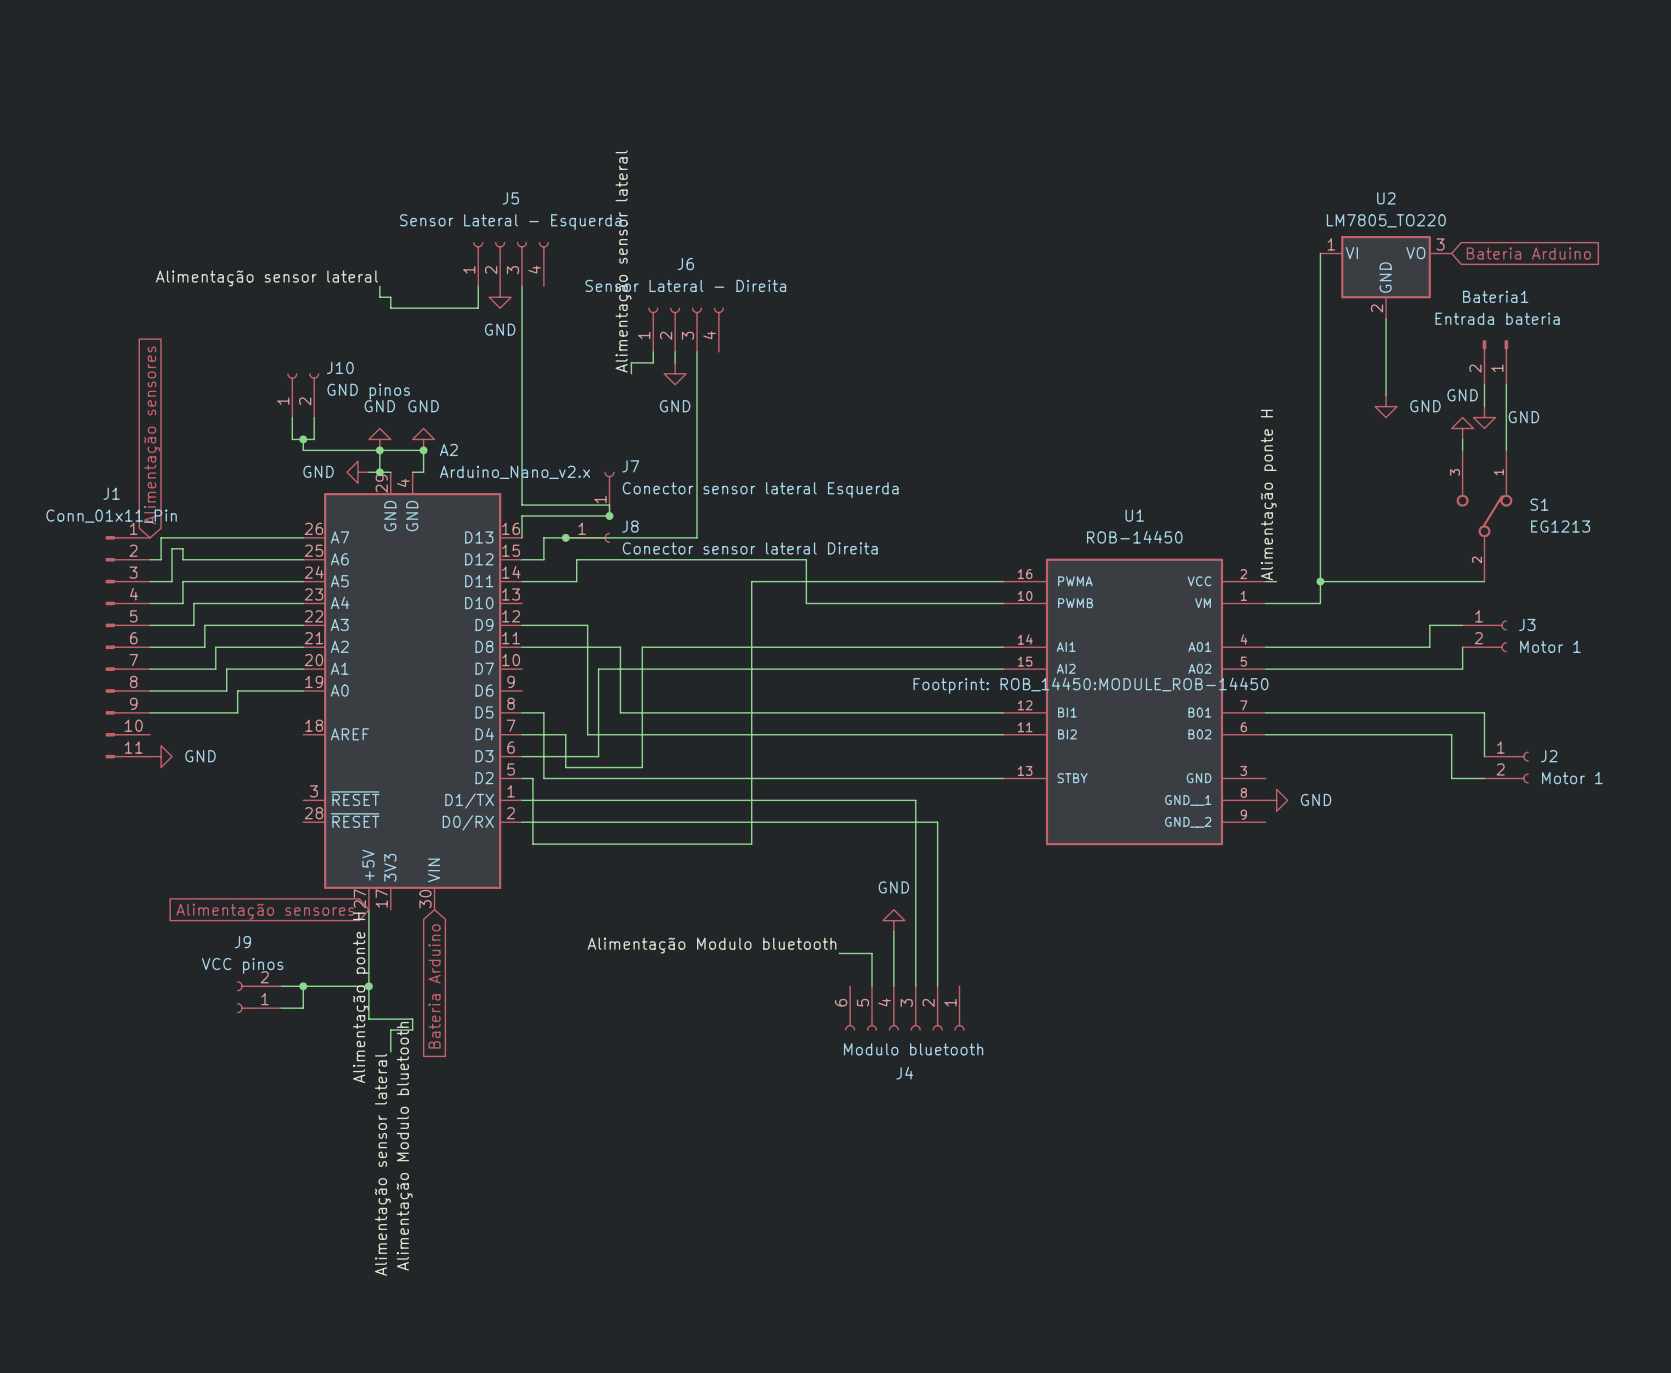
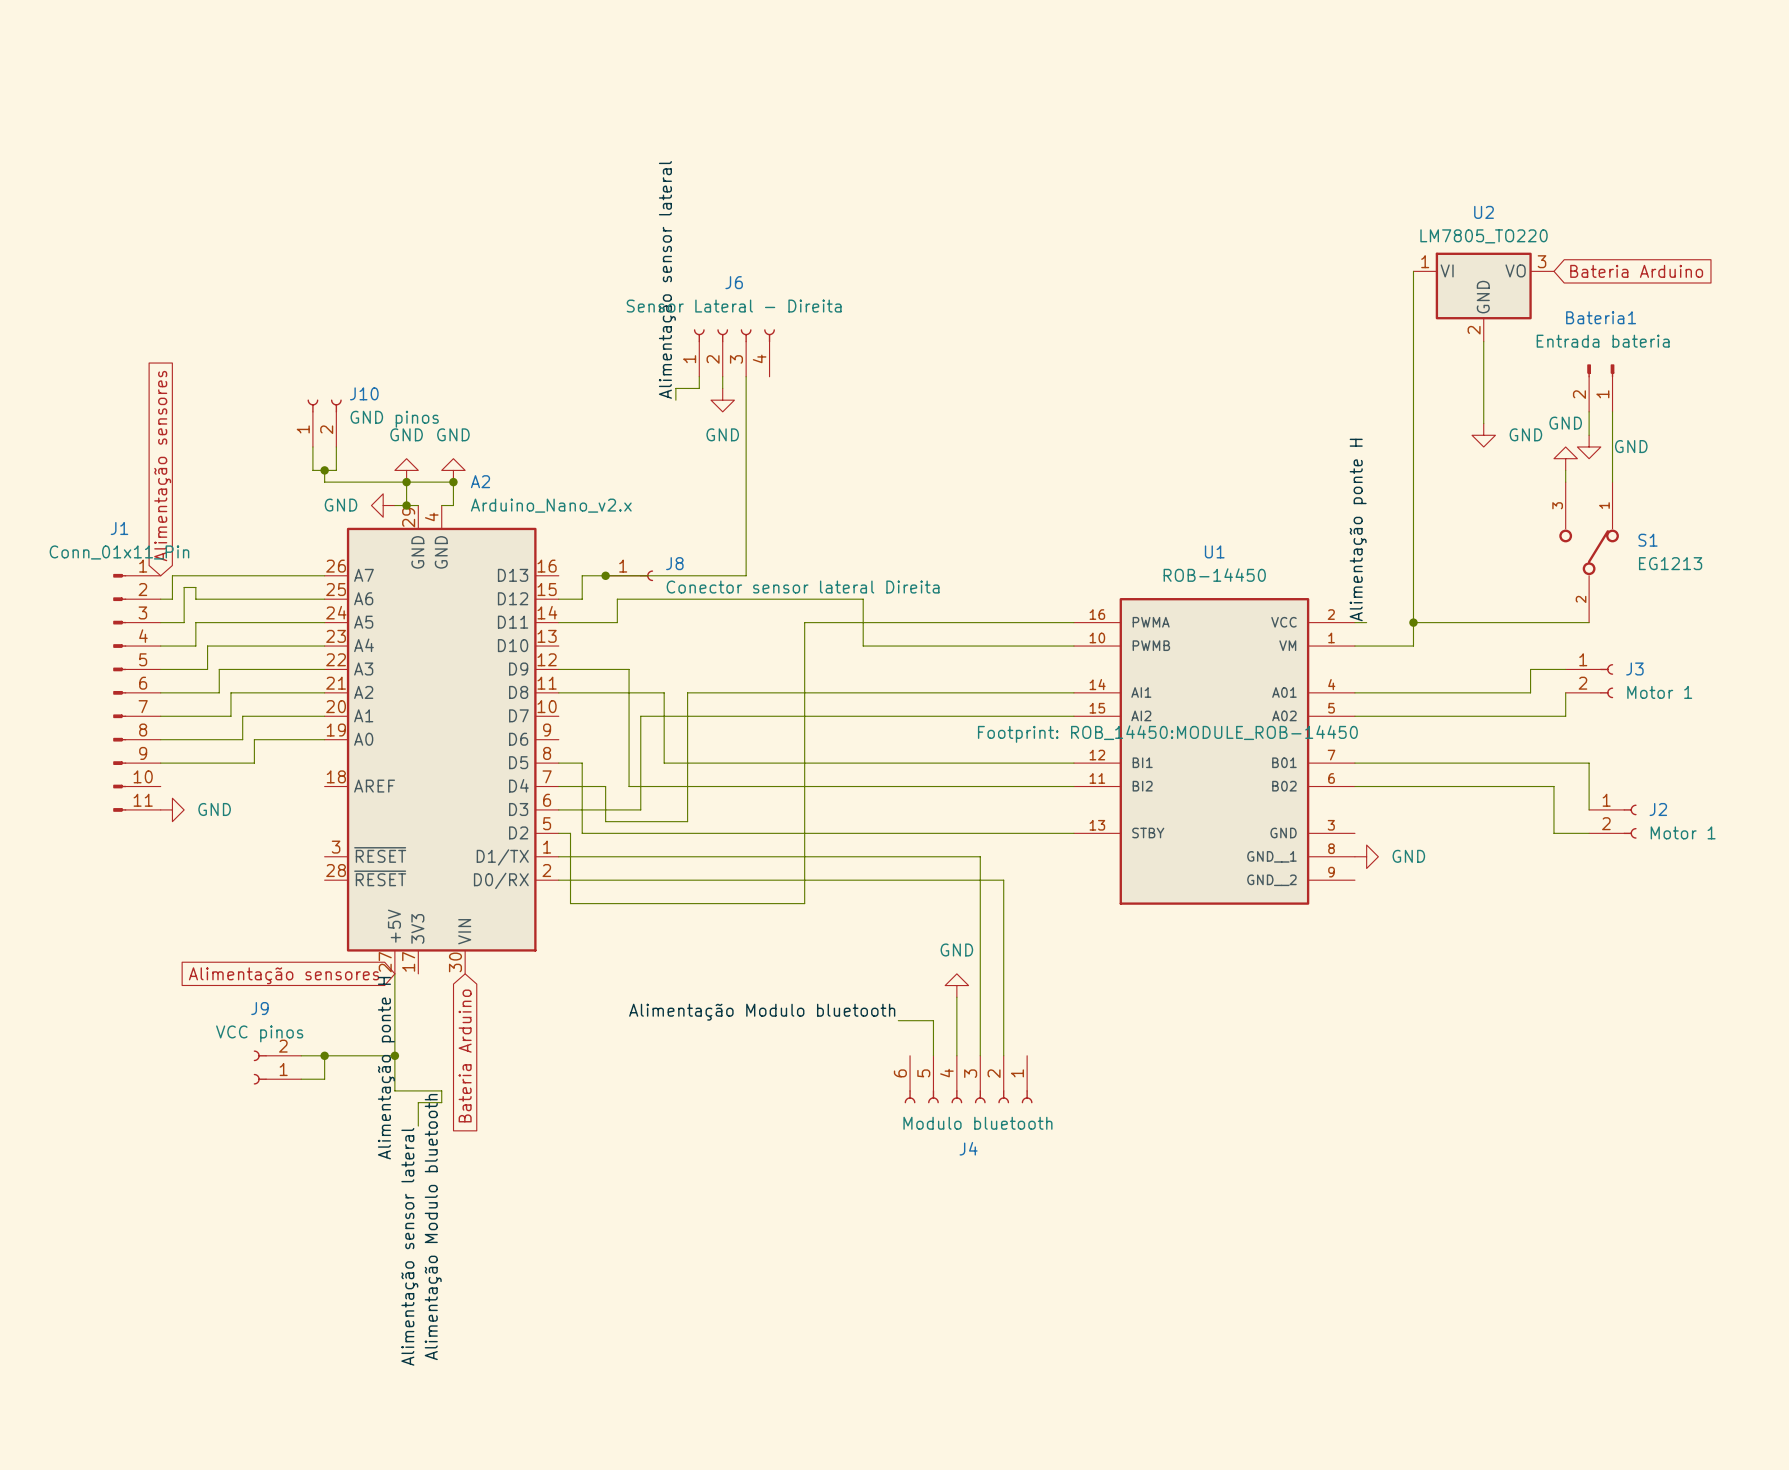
J5: Sensor Lateral - Esquerda (511, 264) -> none
label: Alimentação sensor lateral (266, 278) -> none
wire: (379, 286) (379, 297) (390, 297) (390, 308) (478, 308) (478, 286) -> none
wire: (522, 286) (522, 505) (609, 505) (609, 515) (522, 515) (522, 537) -> none
power symbol: GND (500, 297) -> none
J7: Conector sensor lateral Esquerda (609, 493) -> none
junction: (609, 515) -> none

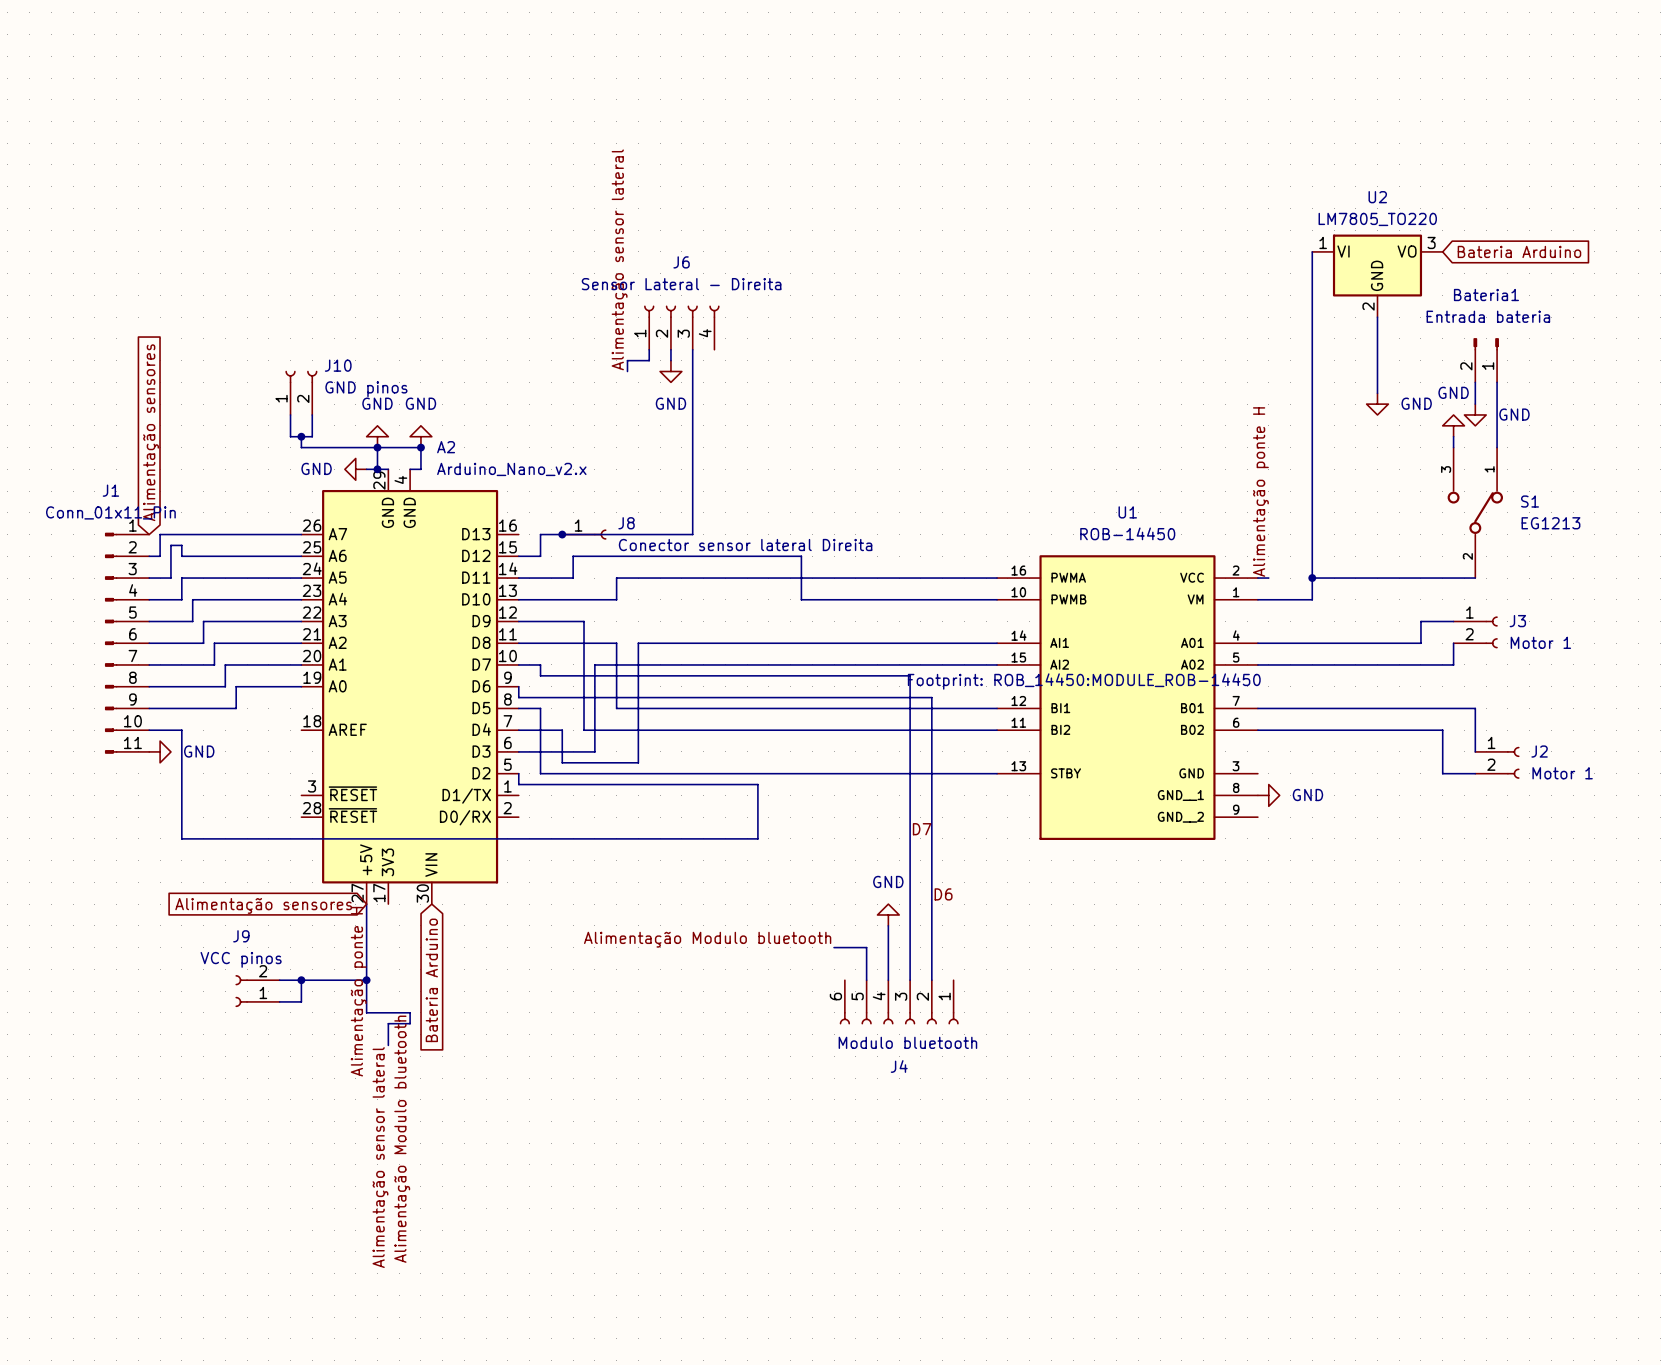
wire: (804, 622) (804, 903) -> (747, 578) (616, 578) (616, 599) (518, 599)
wire: none -> (149, 730) (181, 730) (181, 838) (529, 838)
wire: (558, 833) (570, 833) (570, 903) -> (518, 773) (518, 784) (757, 784) (757, 838) (747, 838)
wire: (558, 856) (980, 856) -> (518, 664) (540, 664) (540, 675) (910, 675) (910, 795)
wire: (558, 880) (1003, 880) -> (518, 686) (518, 697) (931, 697) (931, 817)
label: none -> D7 (922, 829)
label: none -> D6 (943, 894)

